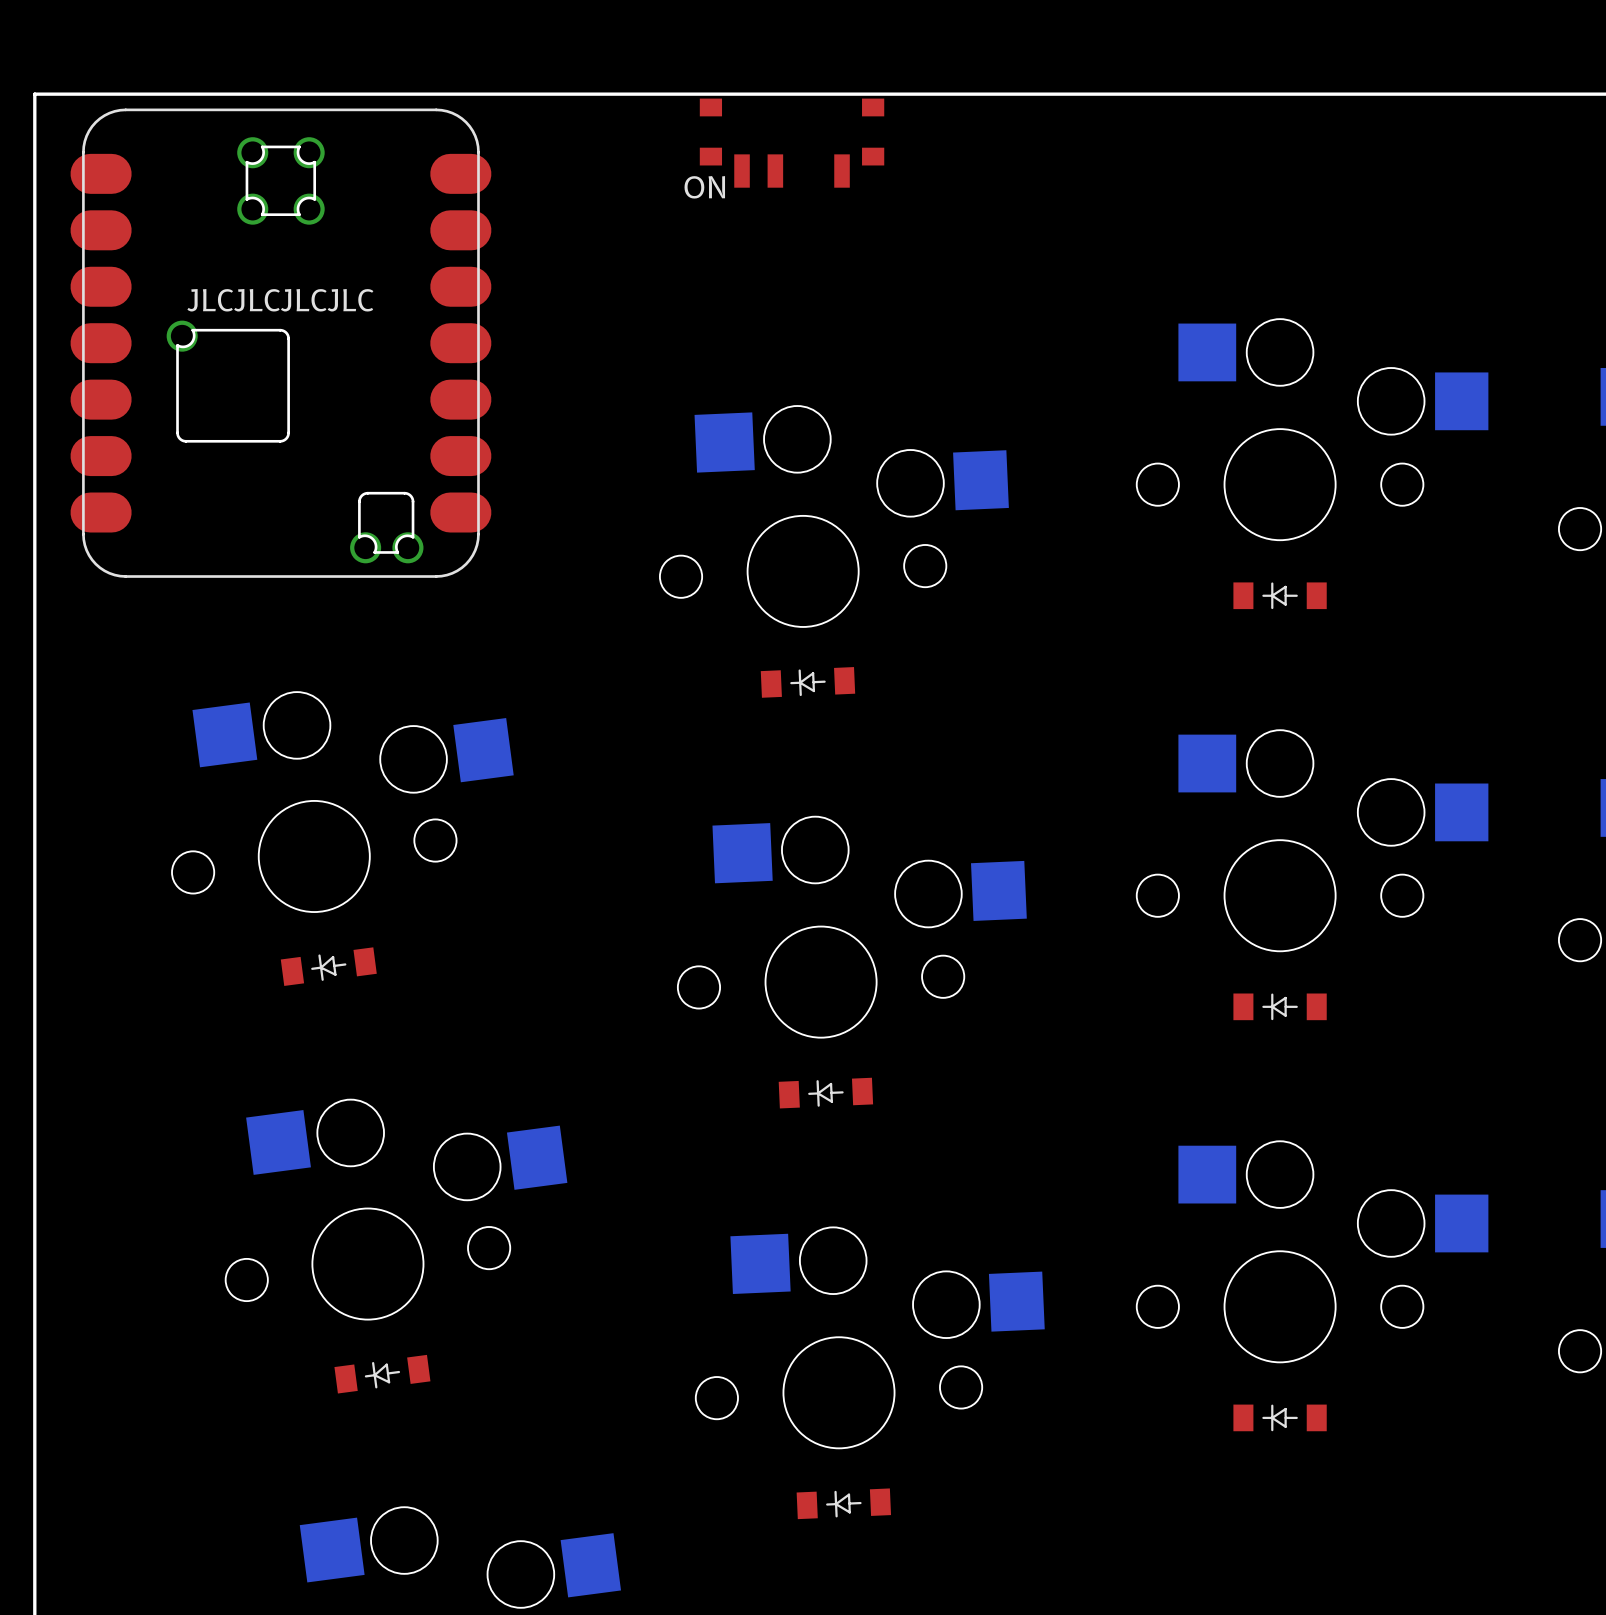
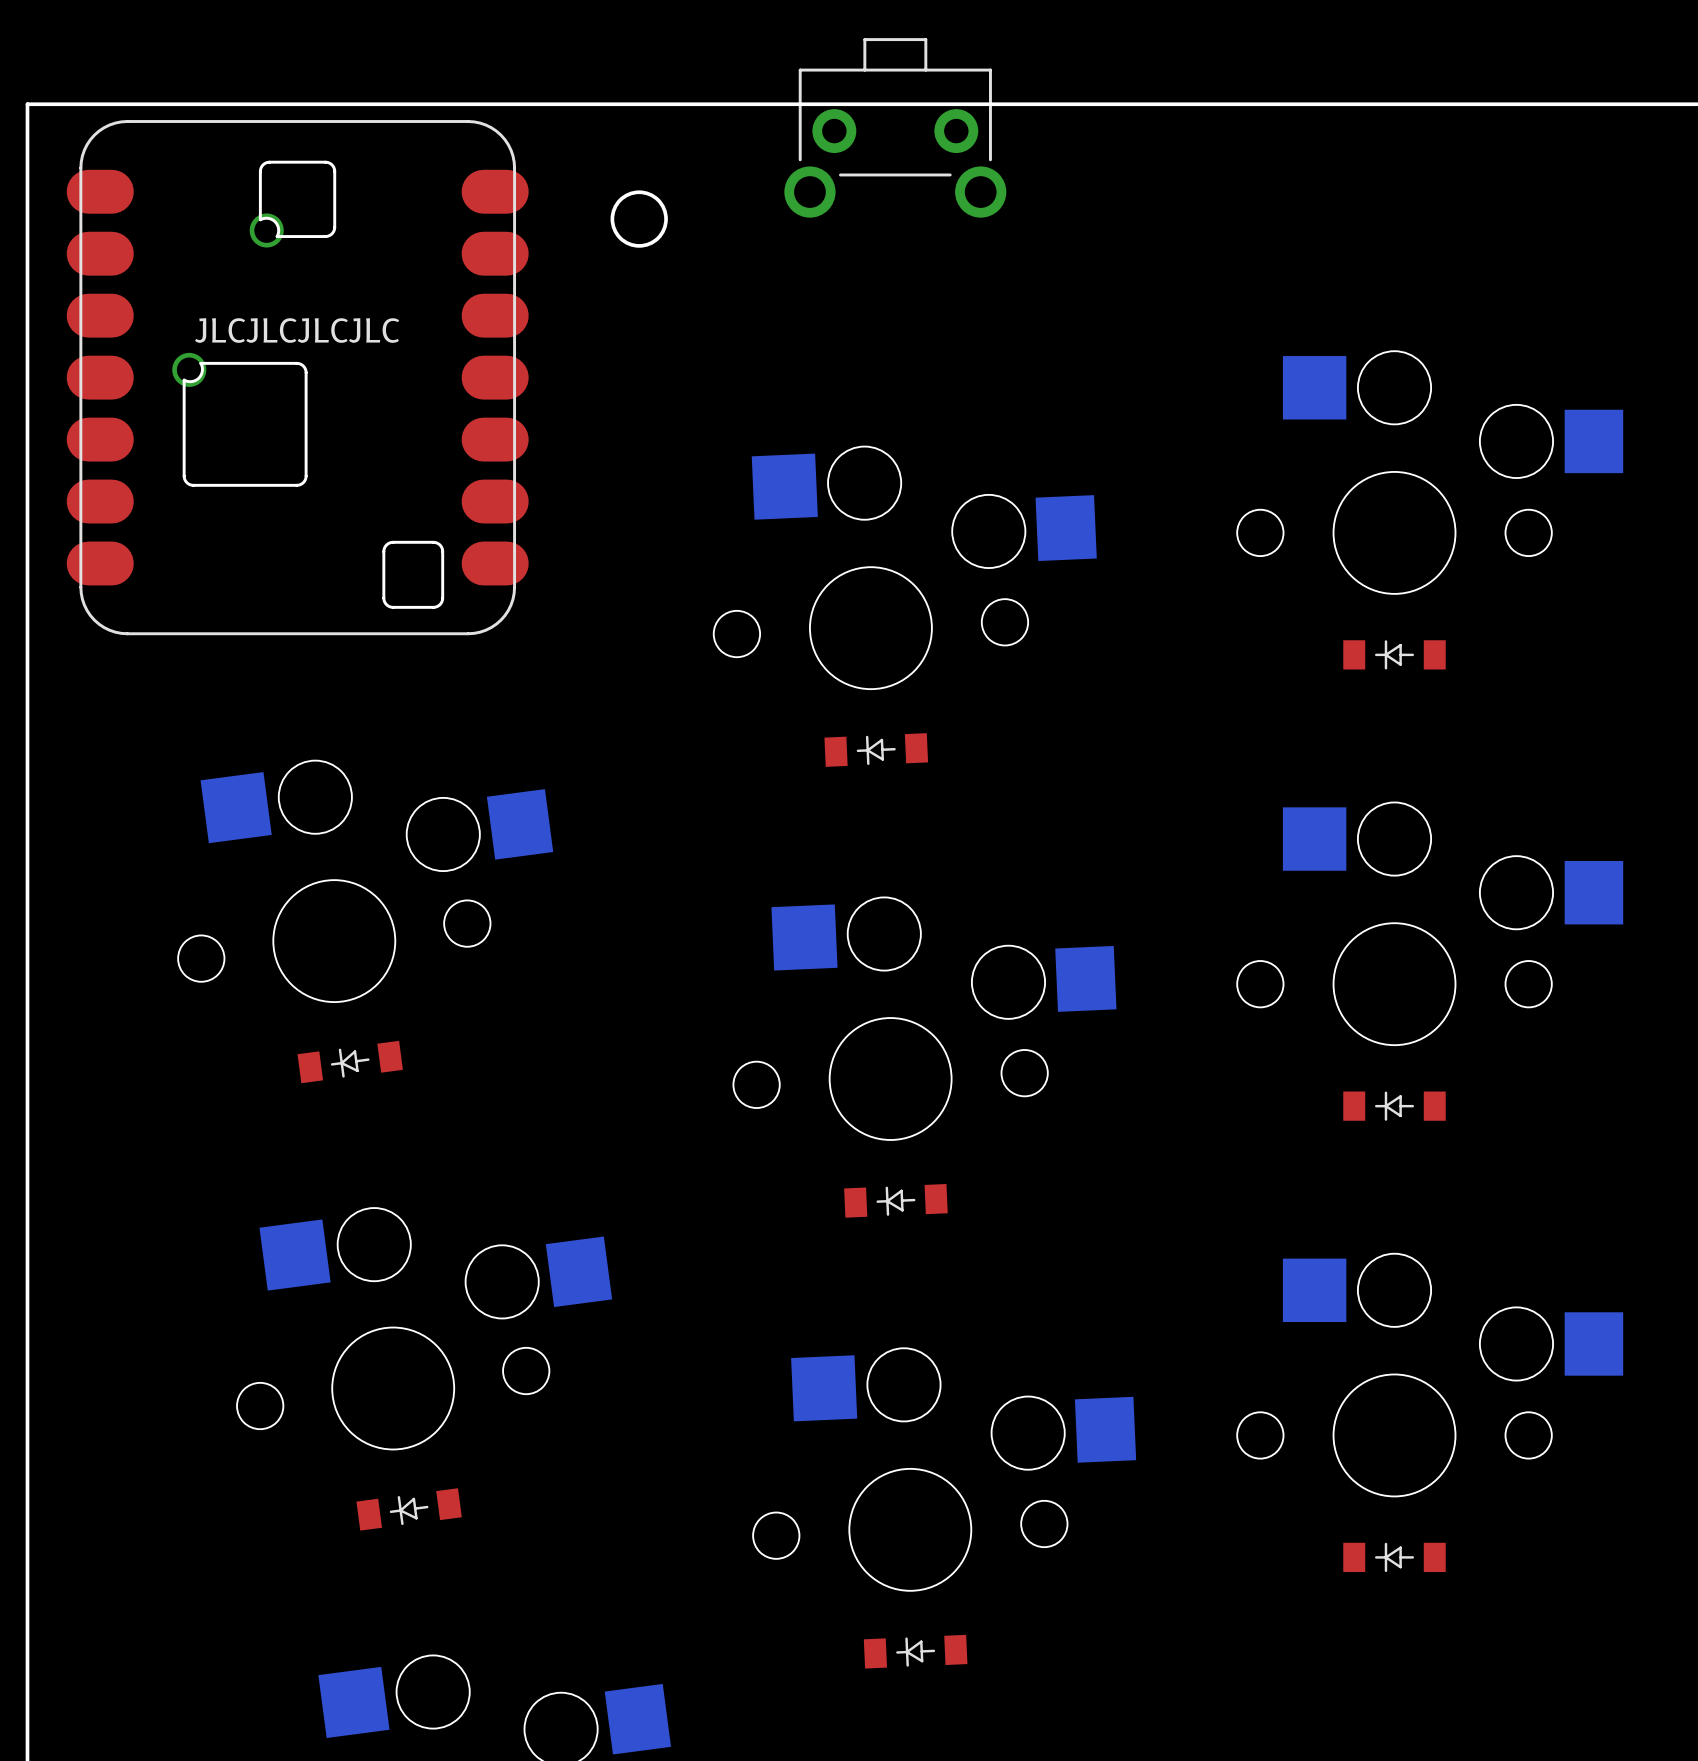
part footprint: [70, 108, 492, 578] -> [66, 120, 529, 636]
part: none -> (895, 127)
part: (792, 143) -> none
round board edge: none -> [610, 190, 668, 248]
text: ON (704, 187) -> none

